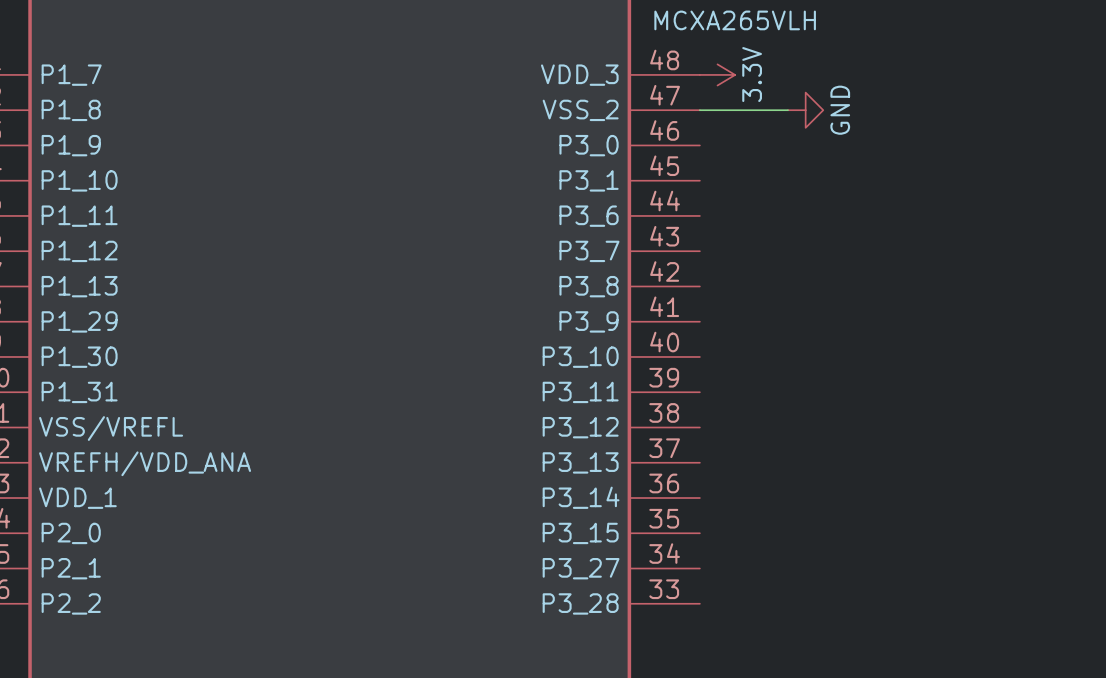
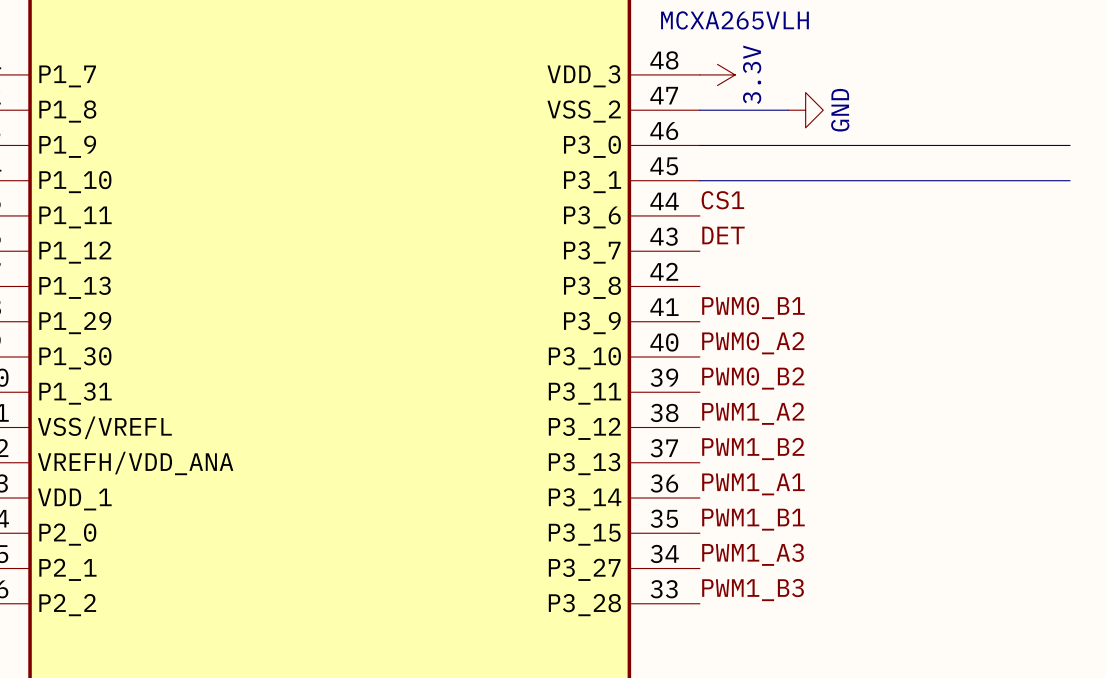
wire: none -> (699, 145) (1070, 145)
wire: none -> (699, 180) (1070, 180)
label: none -> CS1 (722, 200)
label: none -> DET (723, 235)
label: none -> PWM0_B1 (753, 307)
label: none -> PWM0_A2 (753, 343)
label: none -> PWM0_B2 (753, 378)
label: none -> PWM1_A2 (753, 413)
label: none -> PWM1_B2 (753, 449)
label: none -> PWM1_A1 (753, 484)
label: none -> PWM1_B1 (753, 519)
label: none -> PWM1_A3 (753, 554)
label: none -> PWM1_B3 (753, 590)

